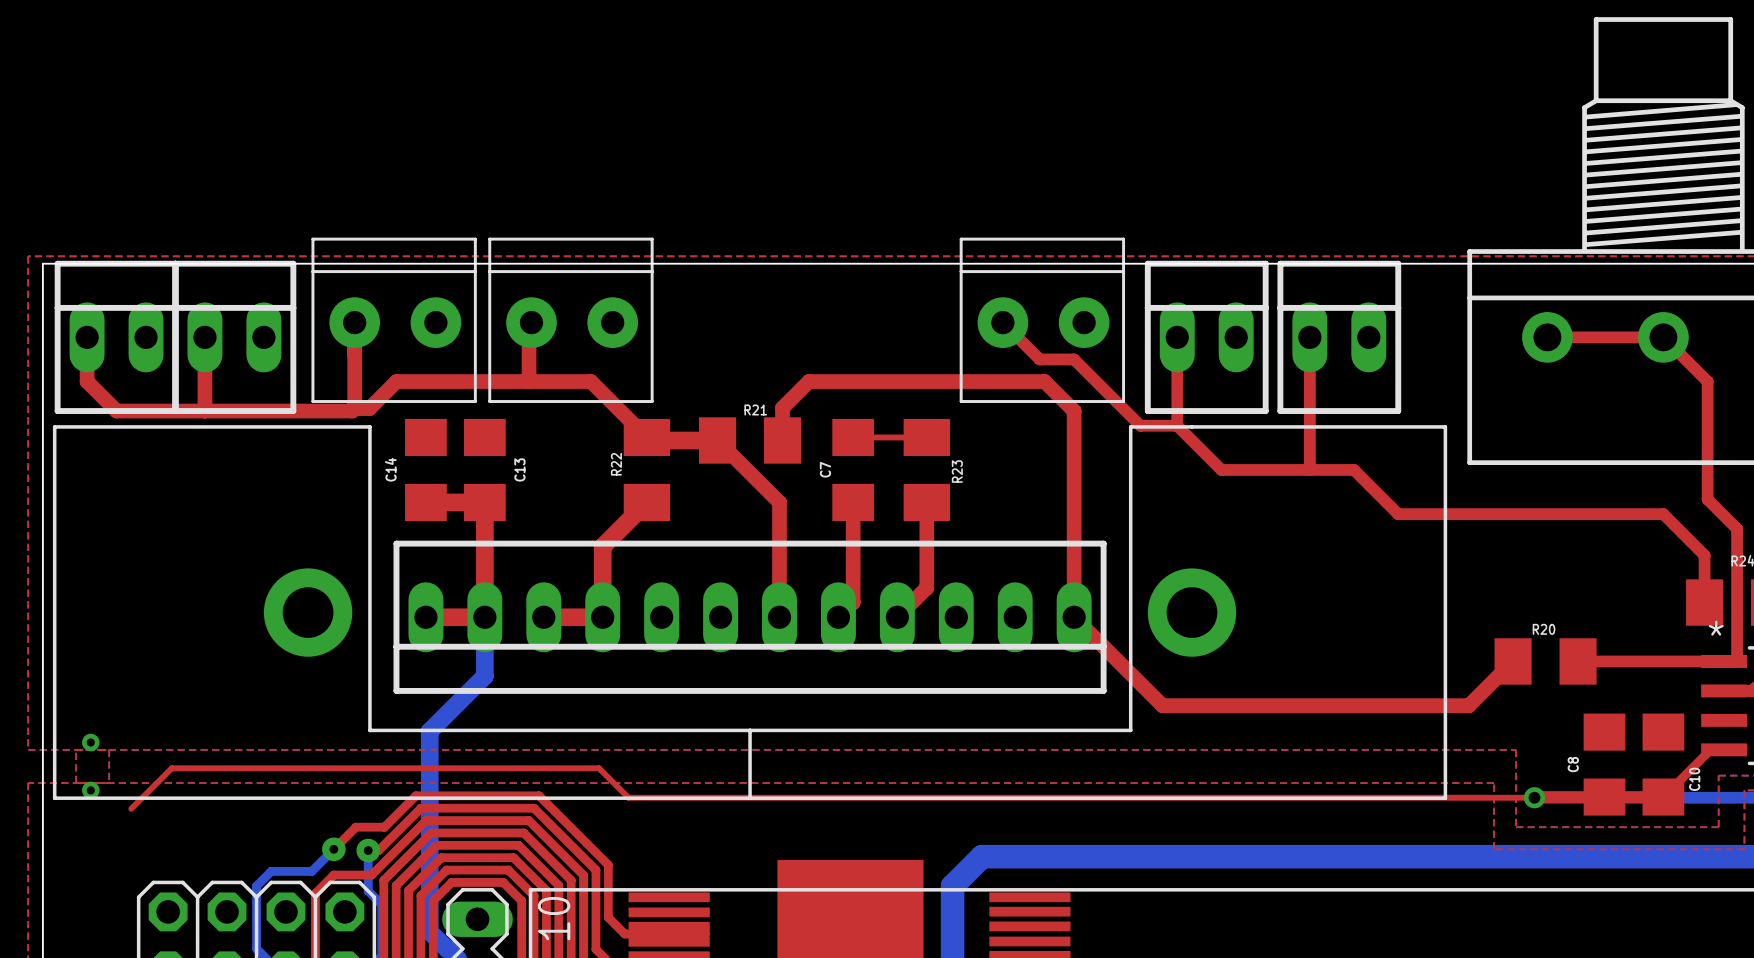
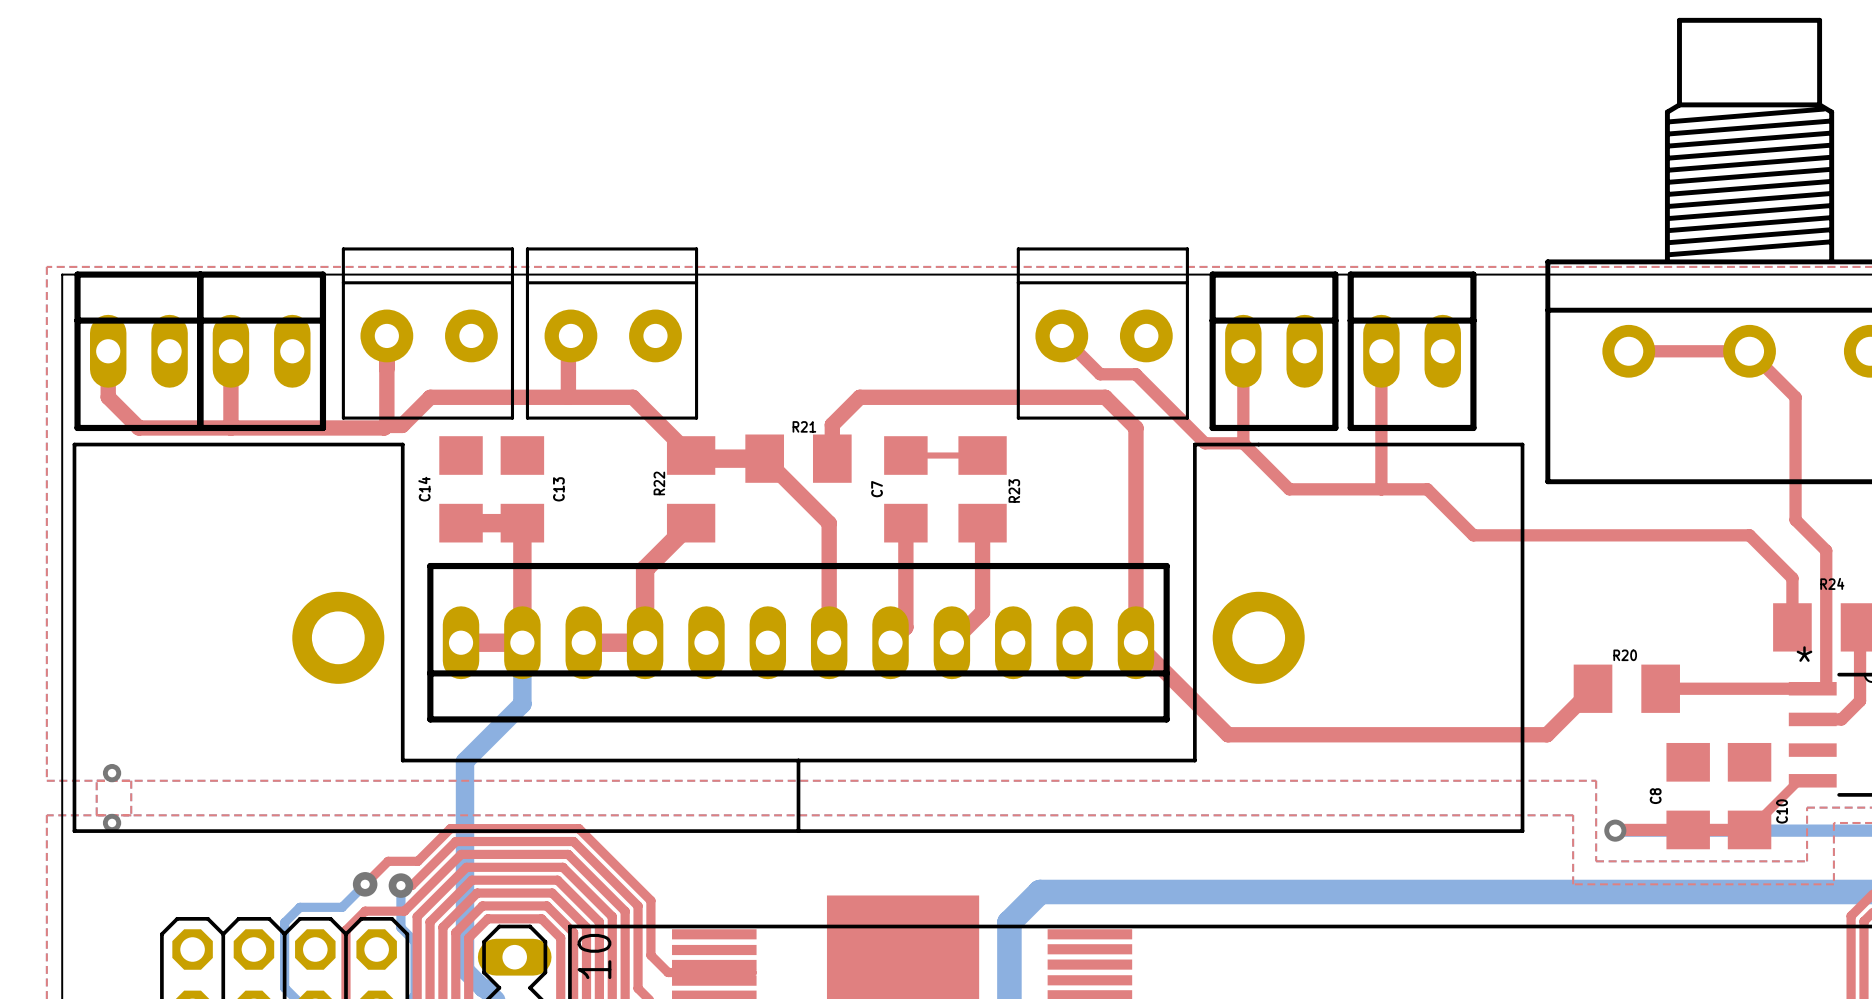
top track: (1534, 797) (628, 797) (599, 768) (171, 768) (131, 808) -> none

